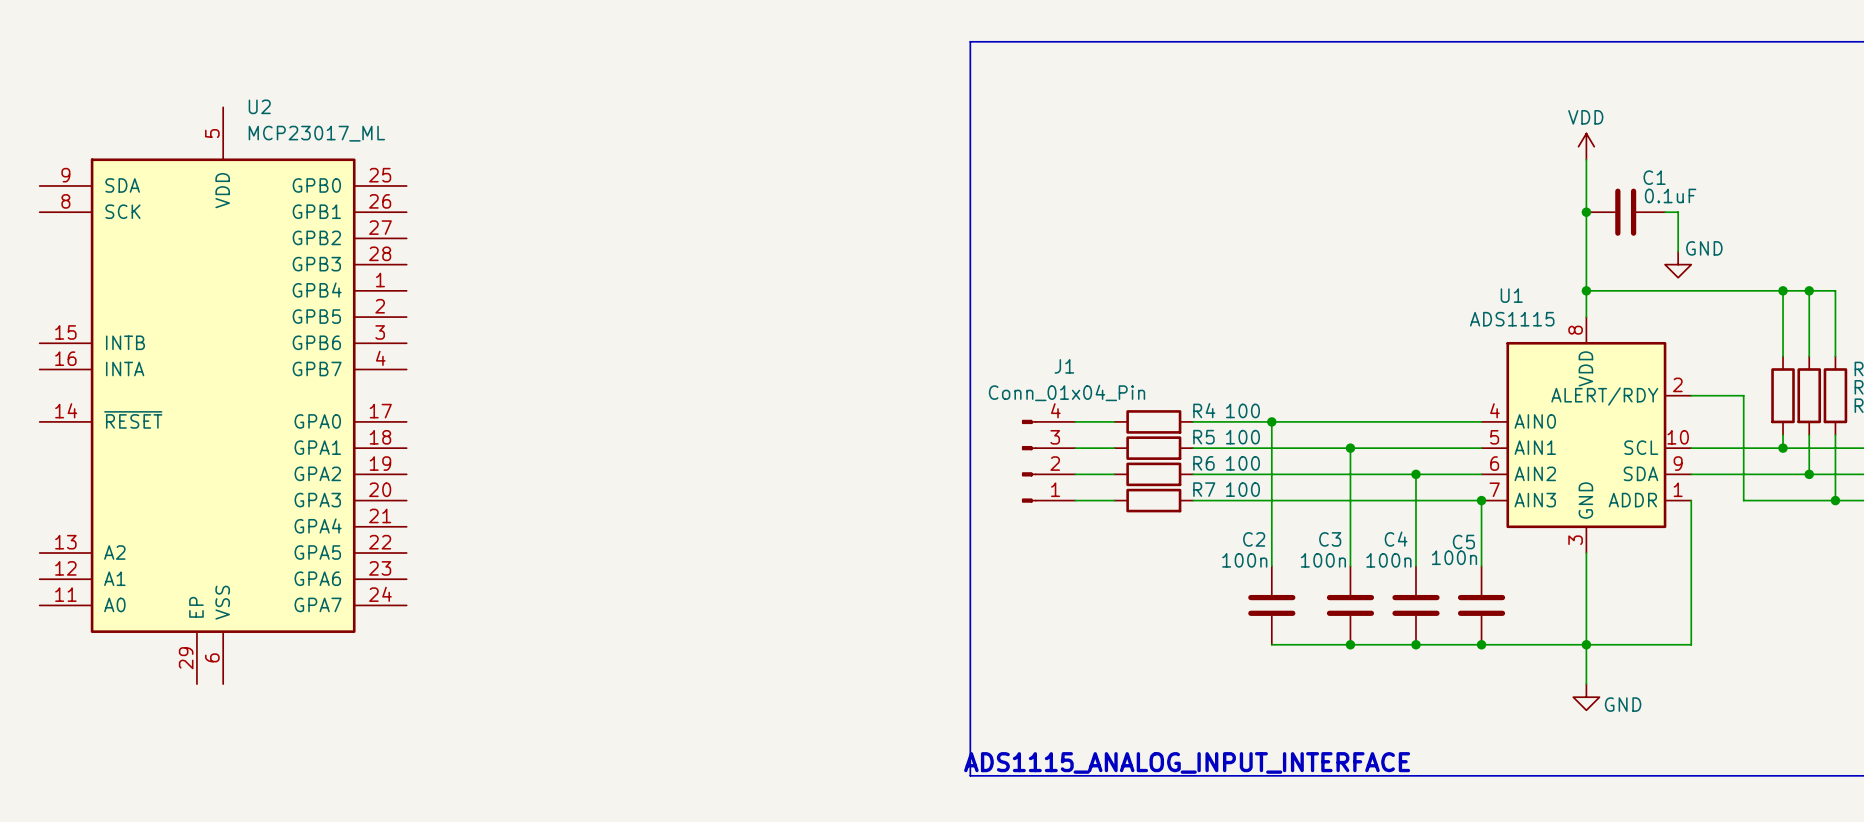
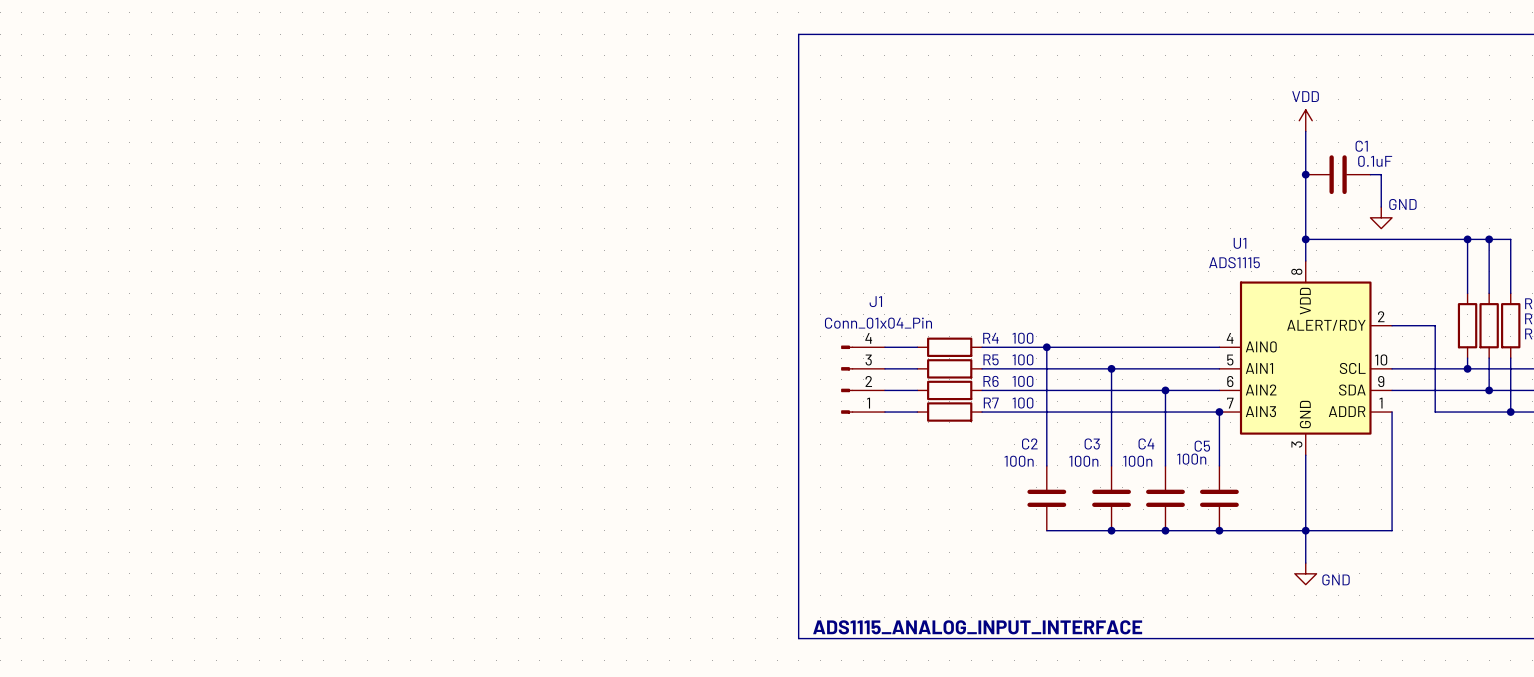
U2: MCP23017_ML (223, 395) -> none

